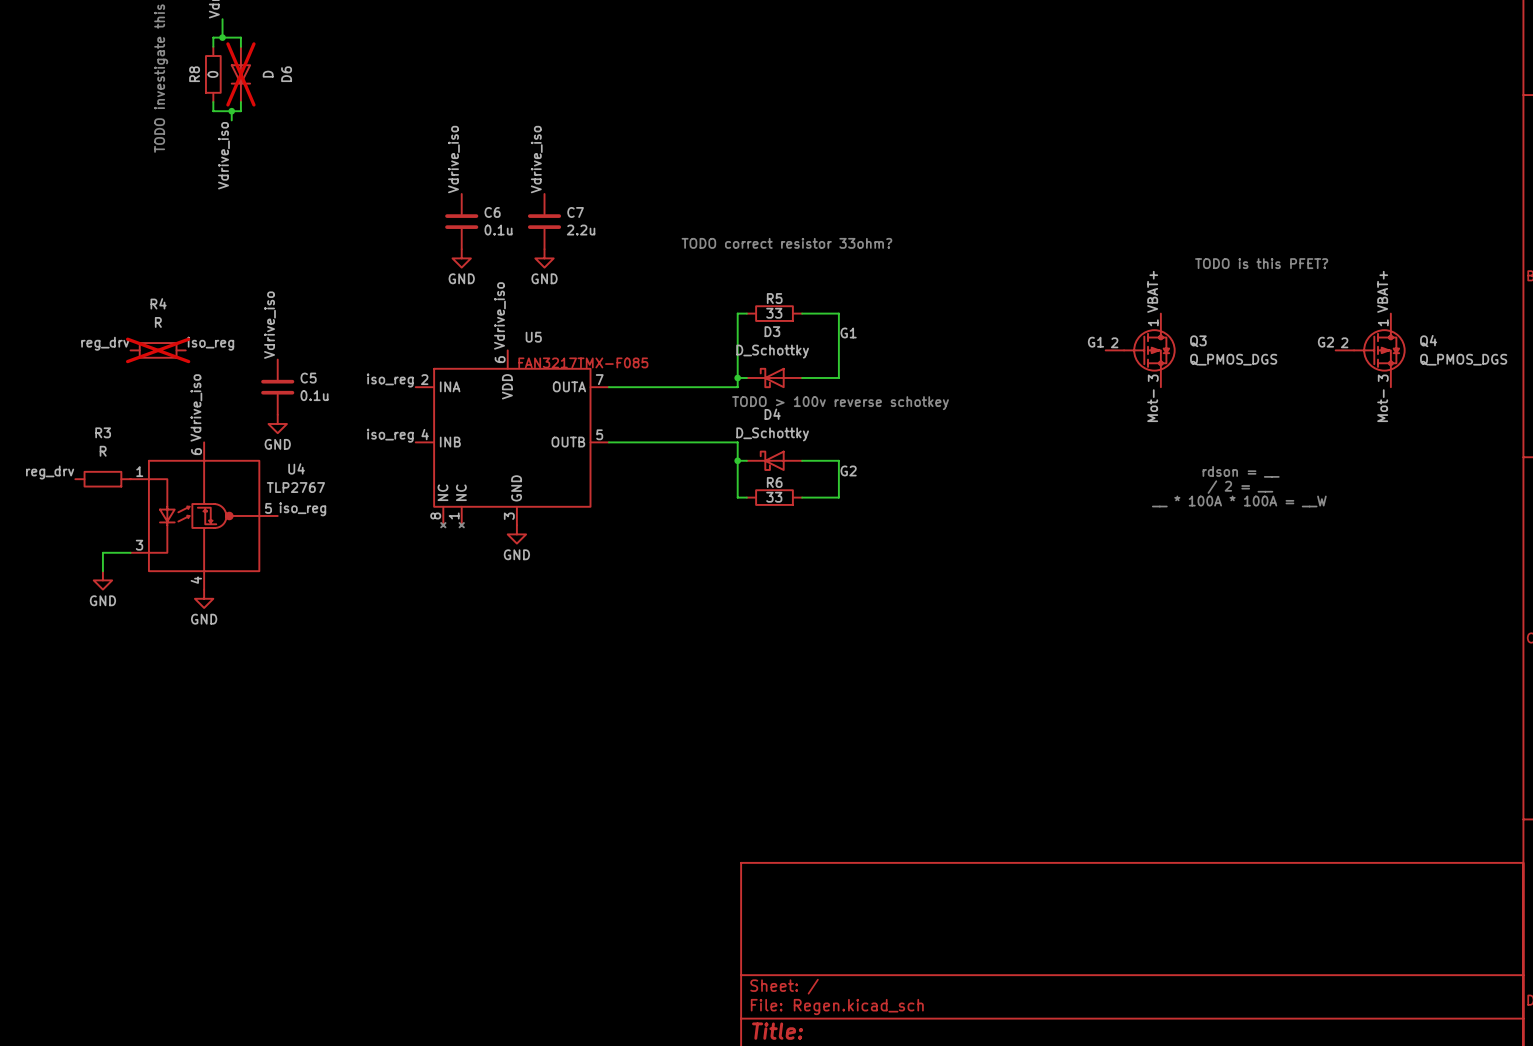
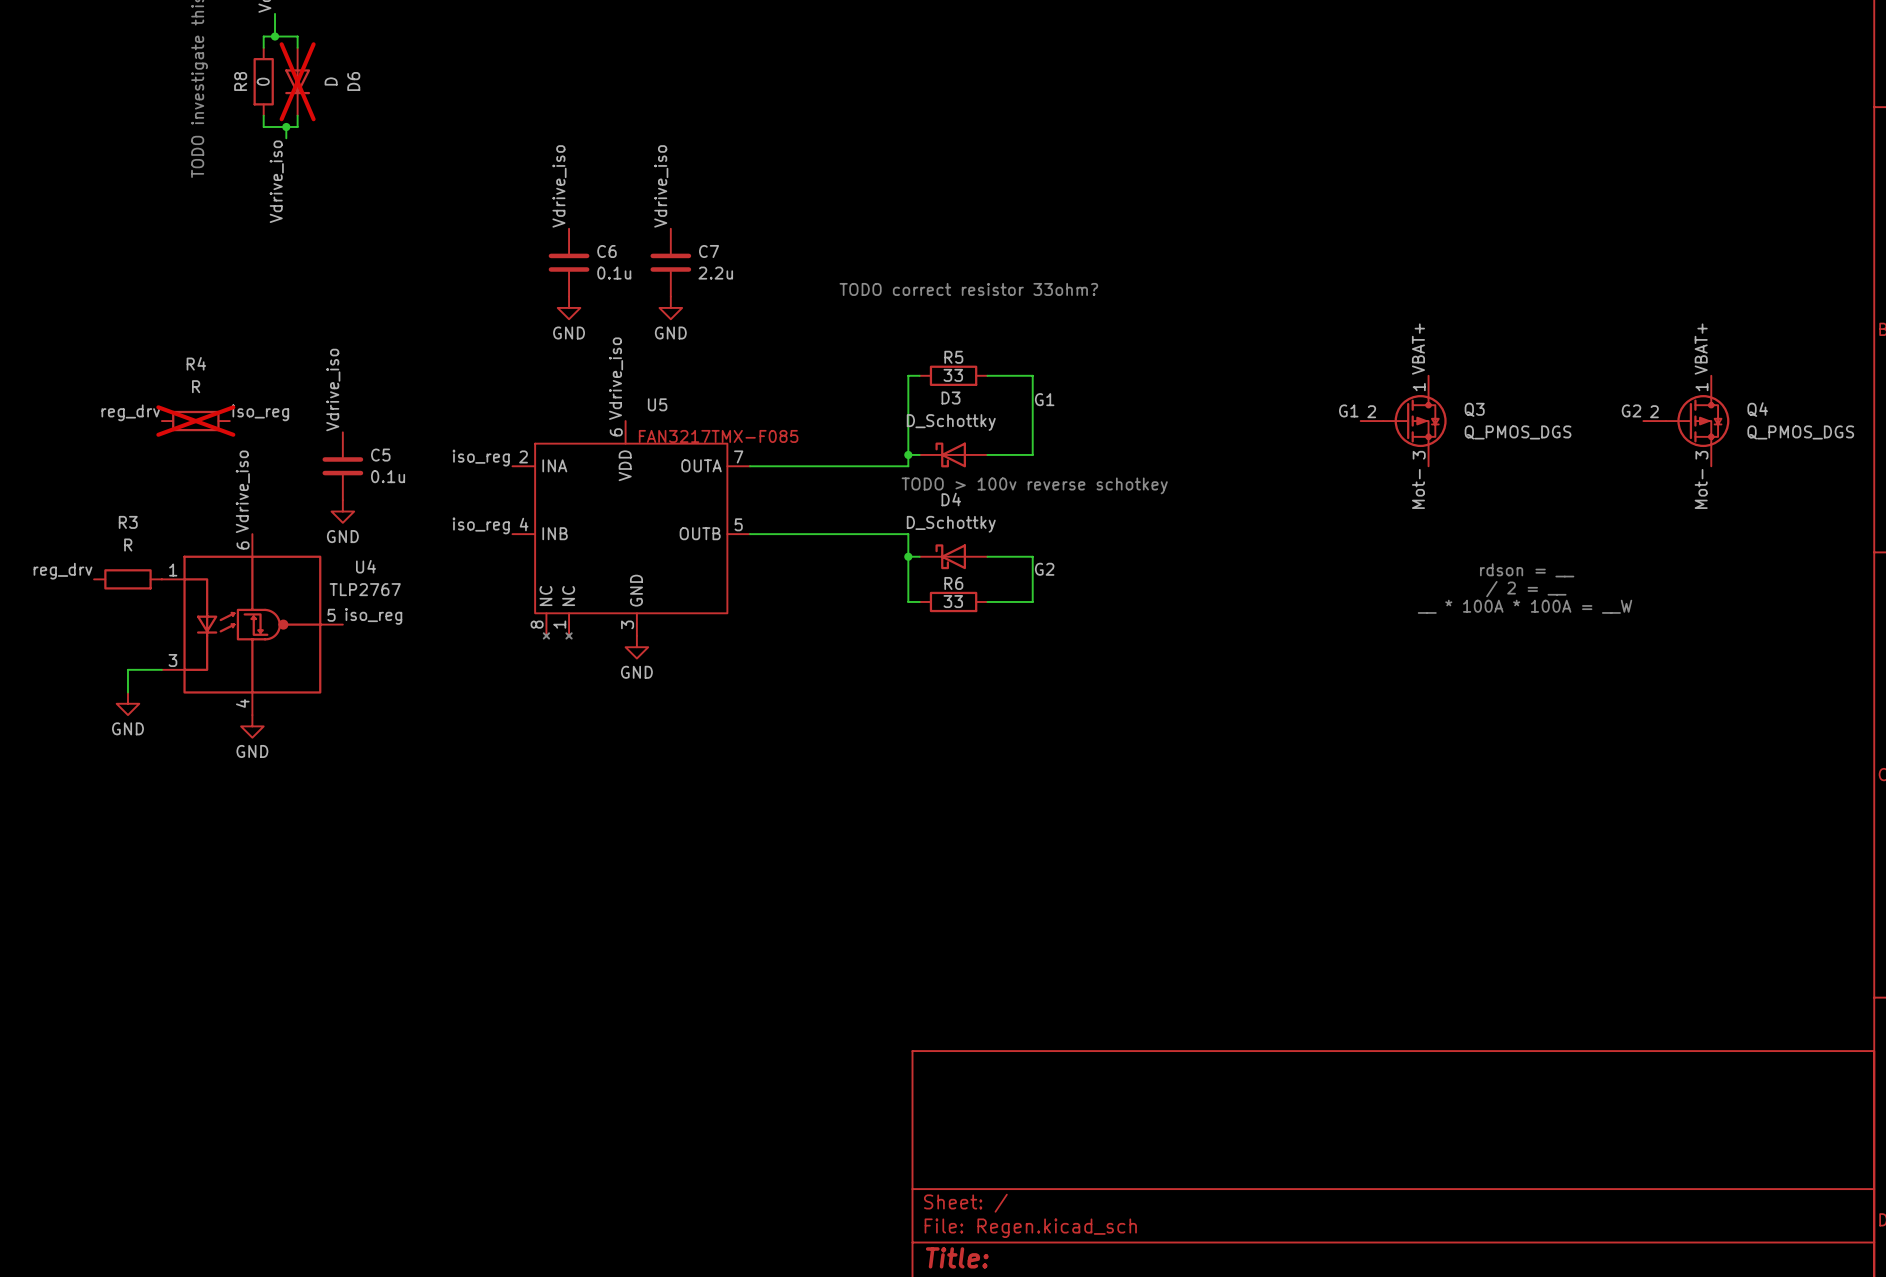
text: TODO is this PFET? (1261, 263) -> none

